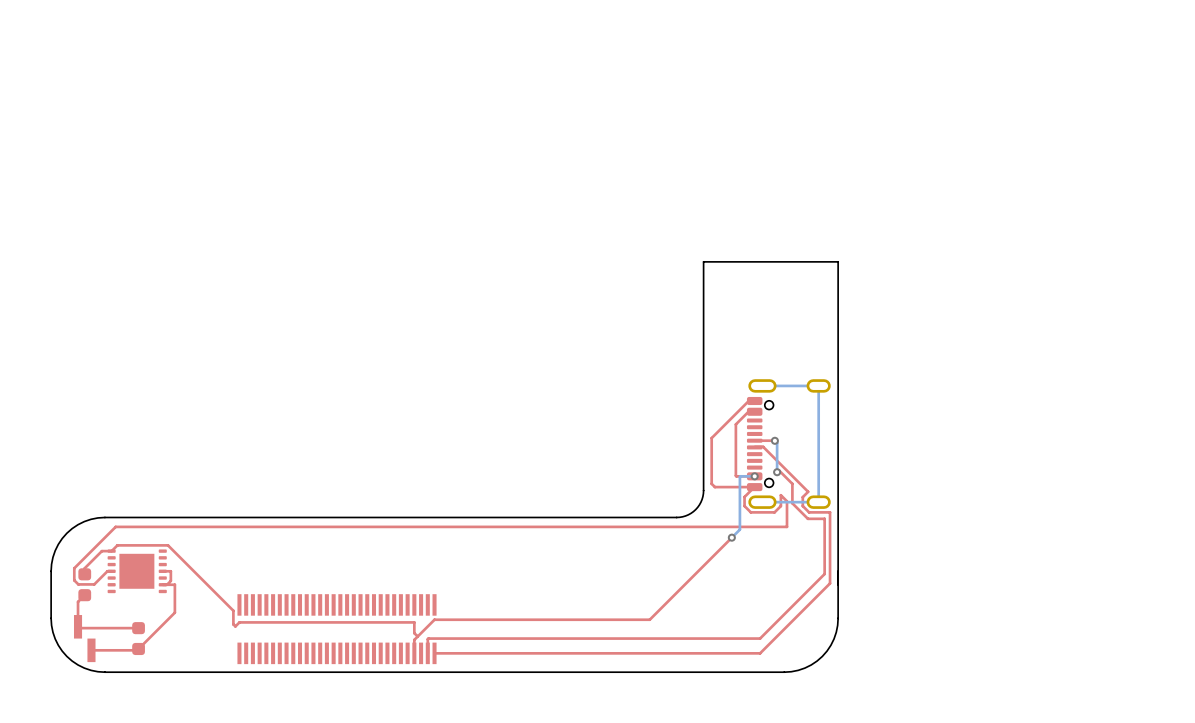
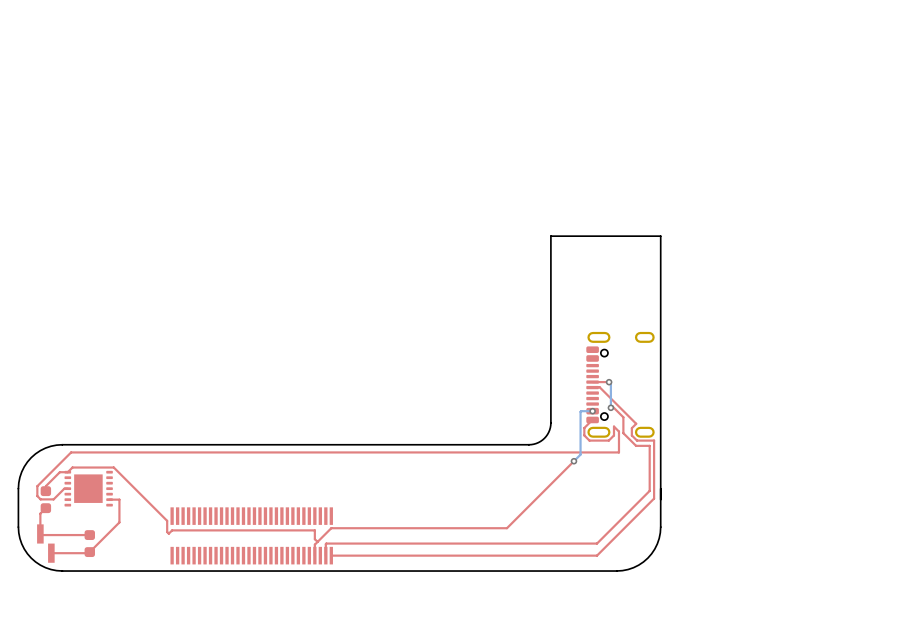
bottom track: (762, 385) (818, 385) (818, 502) (762, 502) -> none
top track: (754, 401) (748, 401) (711, 438) (711, 483) (714, 487) (754, 487) -> none
top track: (754, 411) (748, 411) (735, 424) (735, 475) (754, 476) -> none
top track: (162, 571) (170, 571) (170, 580) (167, 584) -> none

